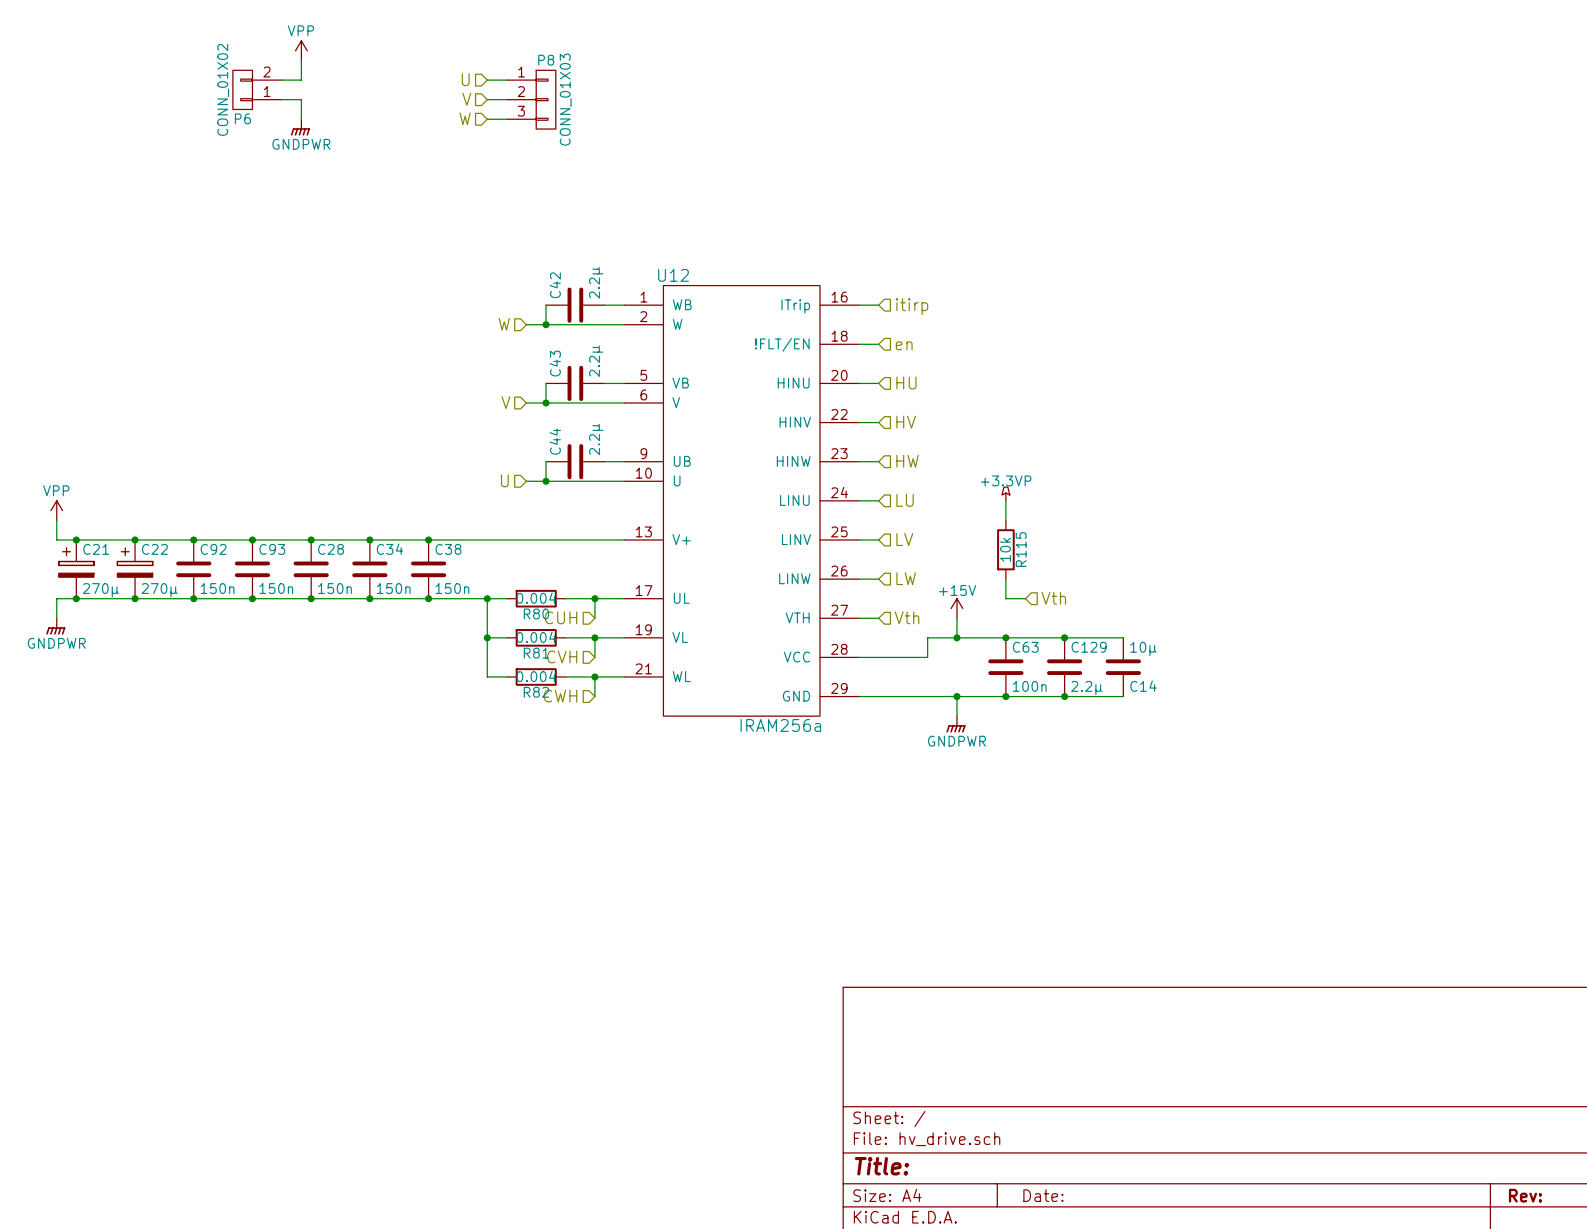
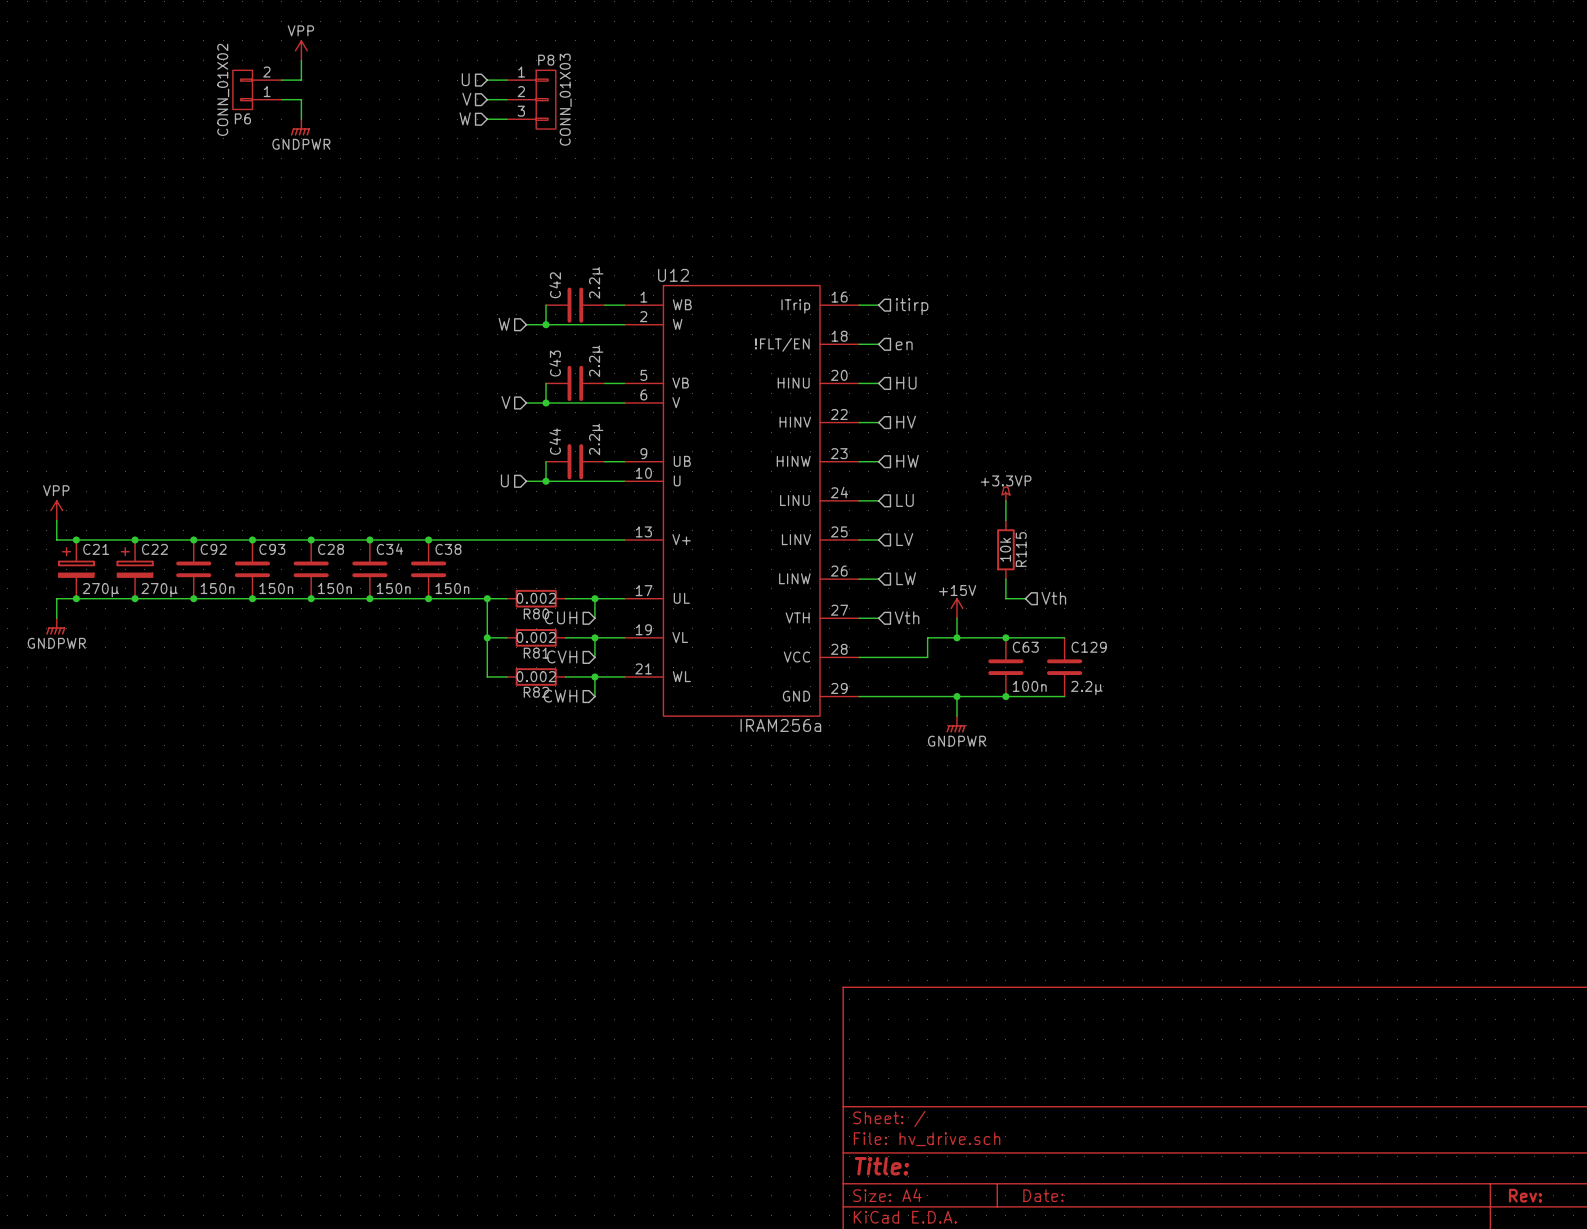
R80 value: 0.004 (536, 598) -> 0.002 (536, 598)
R81 value: 0.004 (536, 637) -> 0.002 (536, 637)
wire: (1064, 637) (1123, 637) -> none
junction: (1064, 637) -> none
C14: 10µ (1123, 667) -> none
R82 value: 0.004 (536, 676) -> 0.002 (536, 676)
wire: (1064, 696) (1123, 696) -> none
junction: (1064, 696) -> none

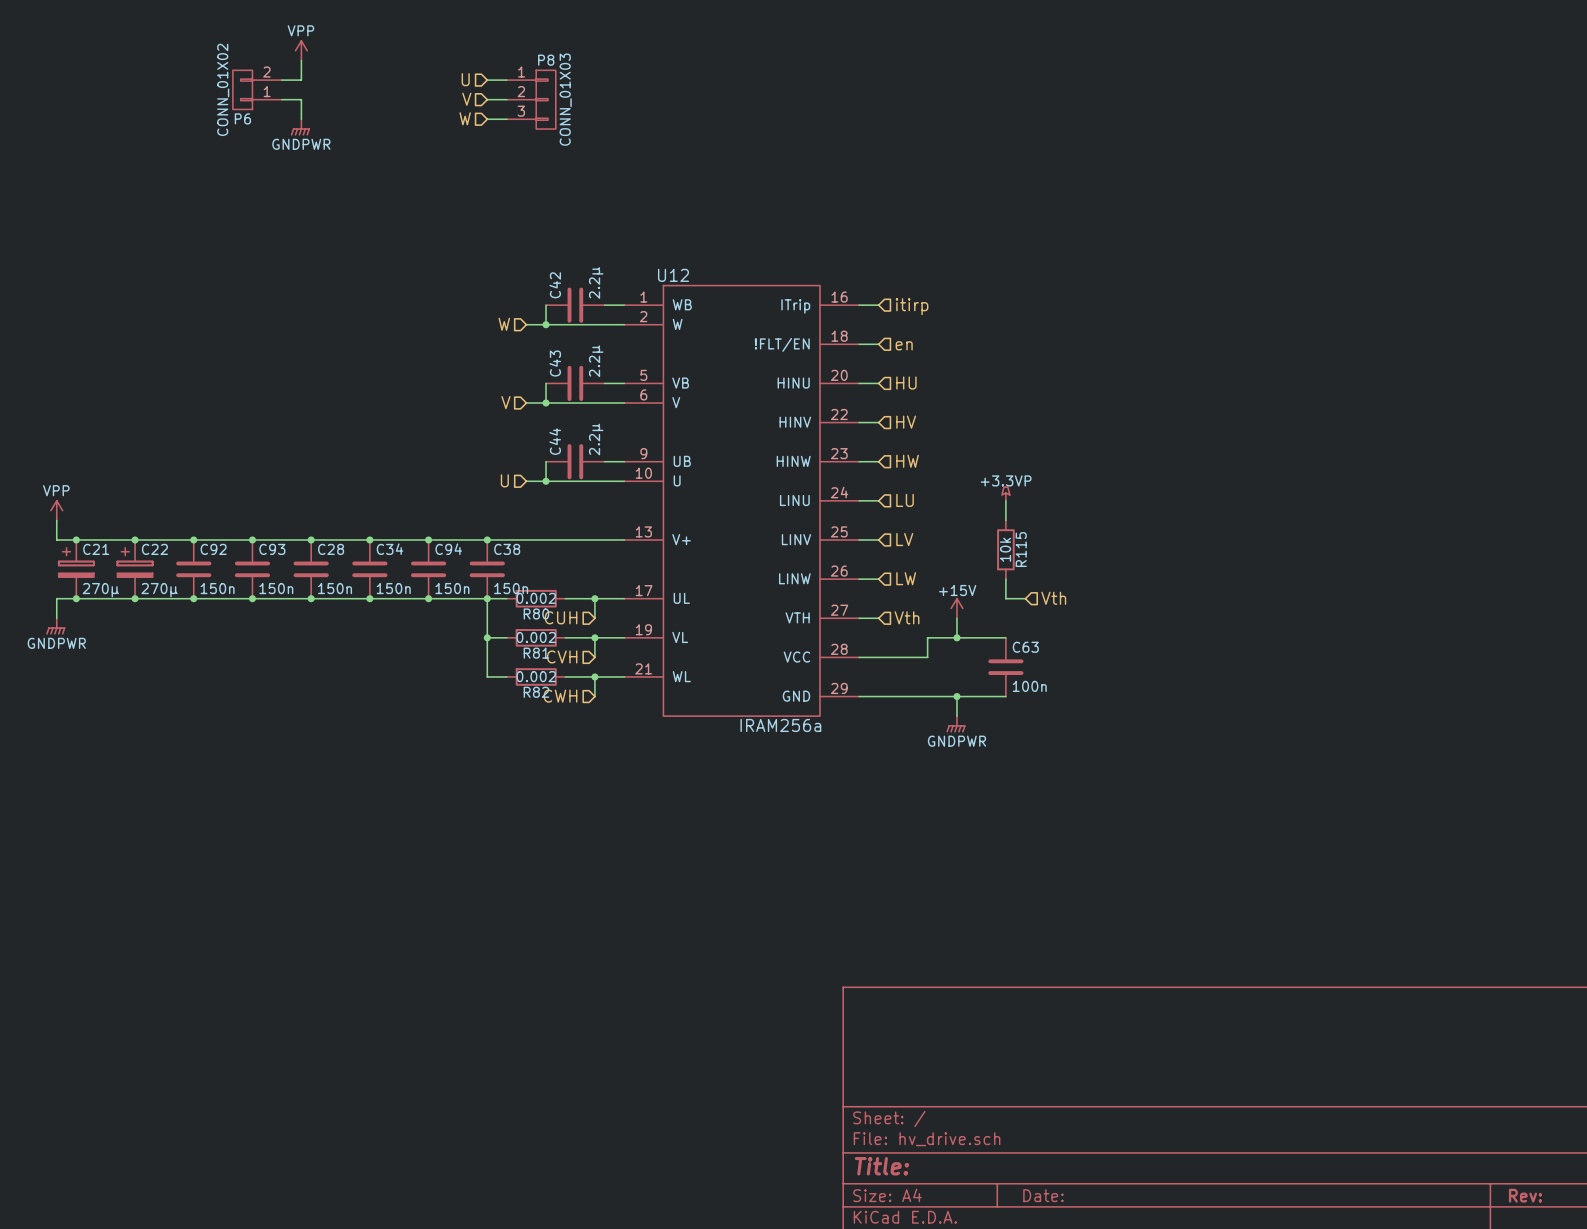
junction: none -> (487, 539)
C38 name: C38 (448, 549) -> C94 (448, 549)
C38: none -> 150n (487, 569)
wire: (1005, 637) (1064, 637) -> none
junction: (1005, 637) -> none
C129: 2.2µ (1064, 667) -> none
wire: (1005, 696) (1064, 696) -> none
junction: (1005, 696) -> none

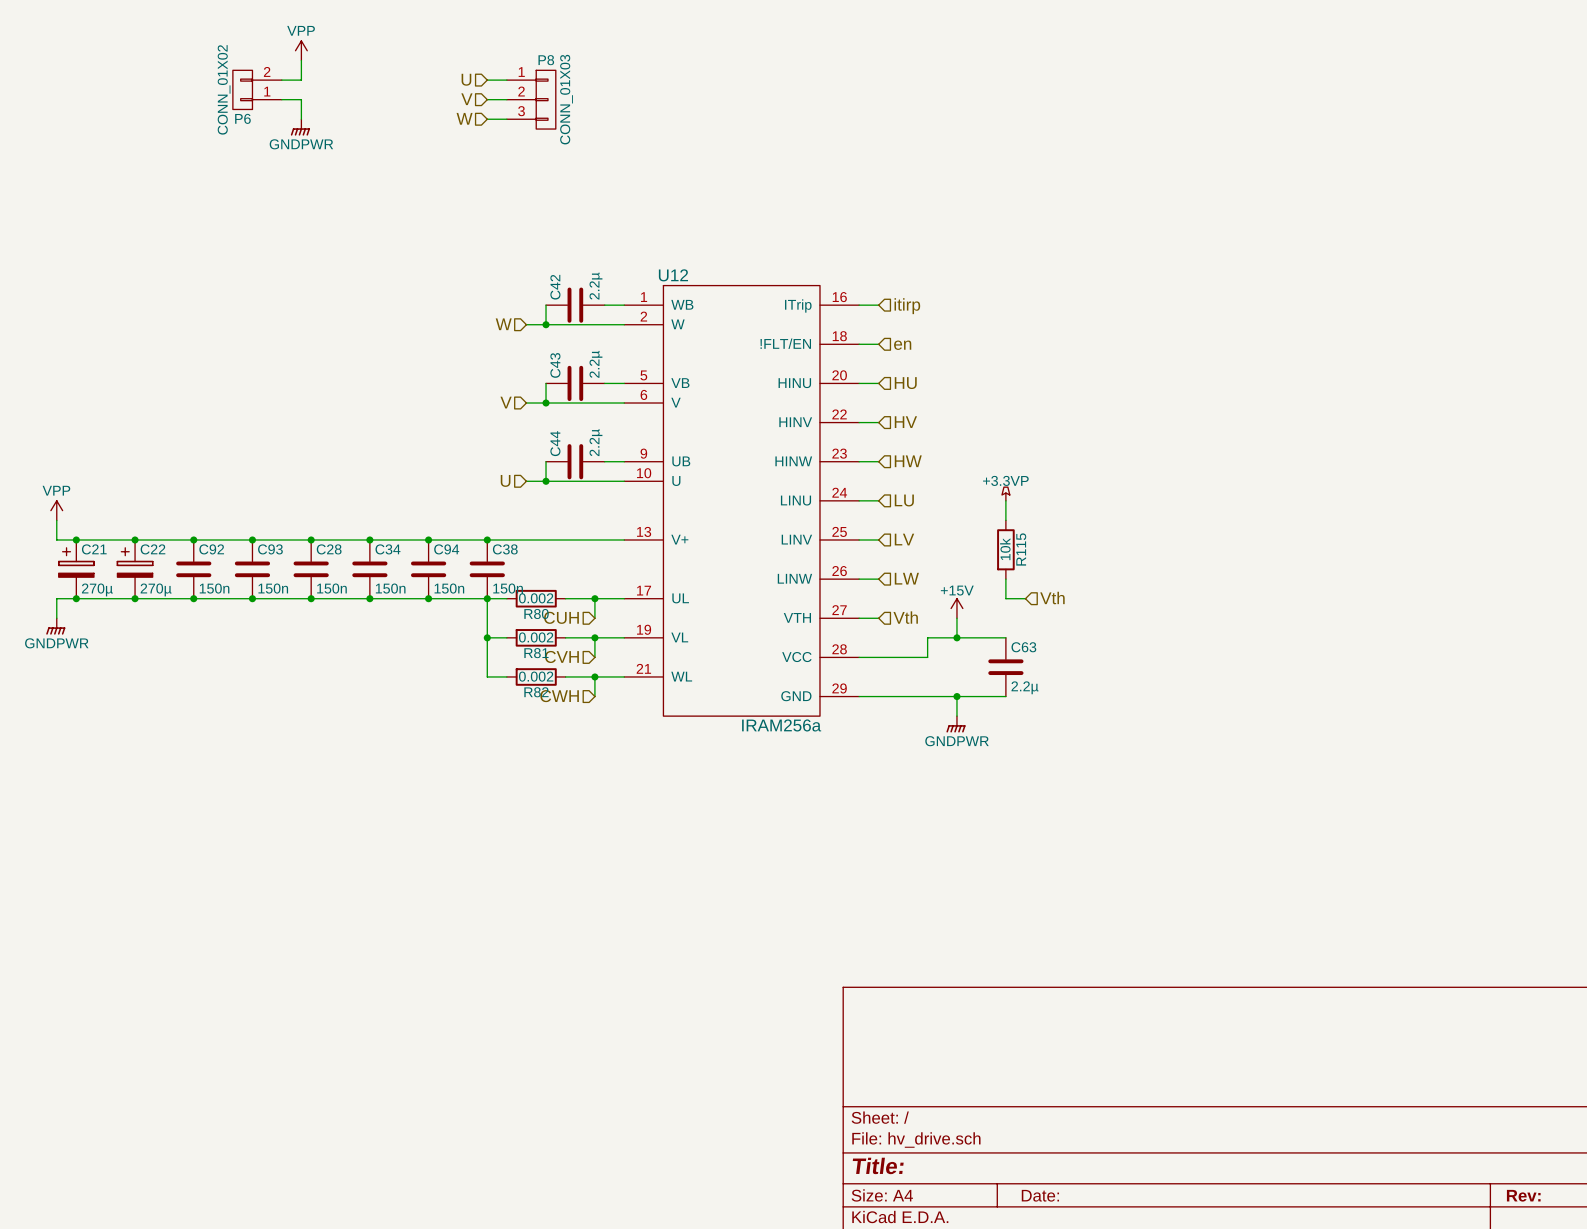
C63 value: 100n (1029, 686) -> 2.2µ (1024, 687)

